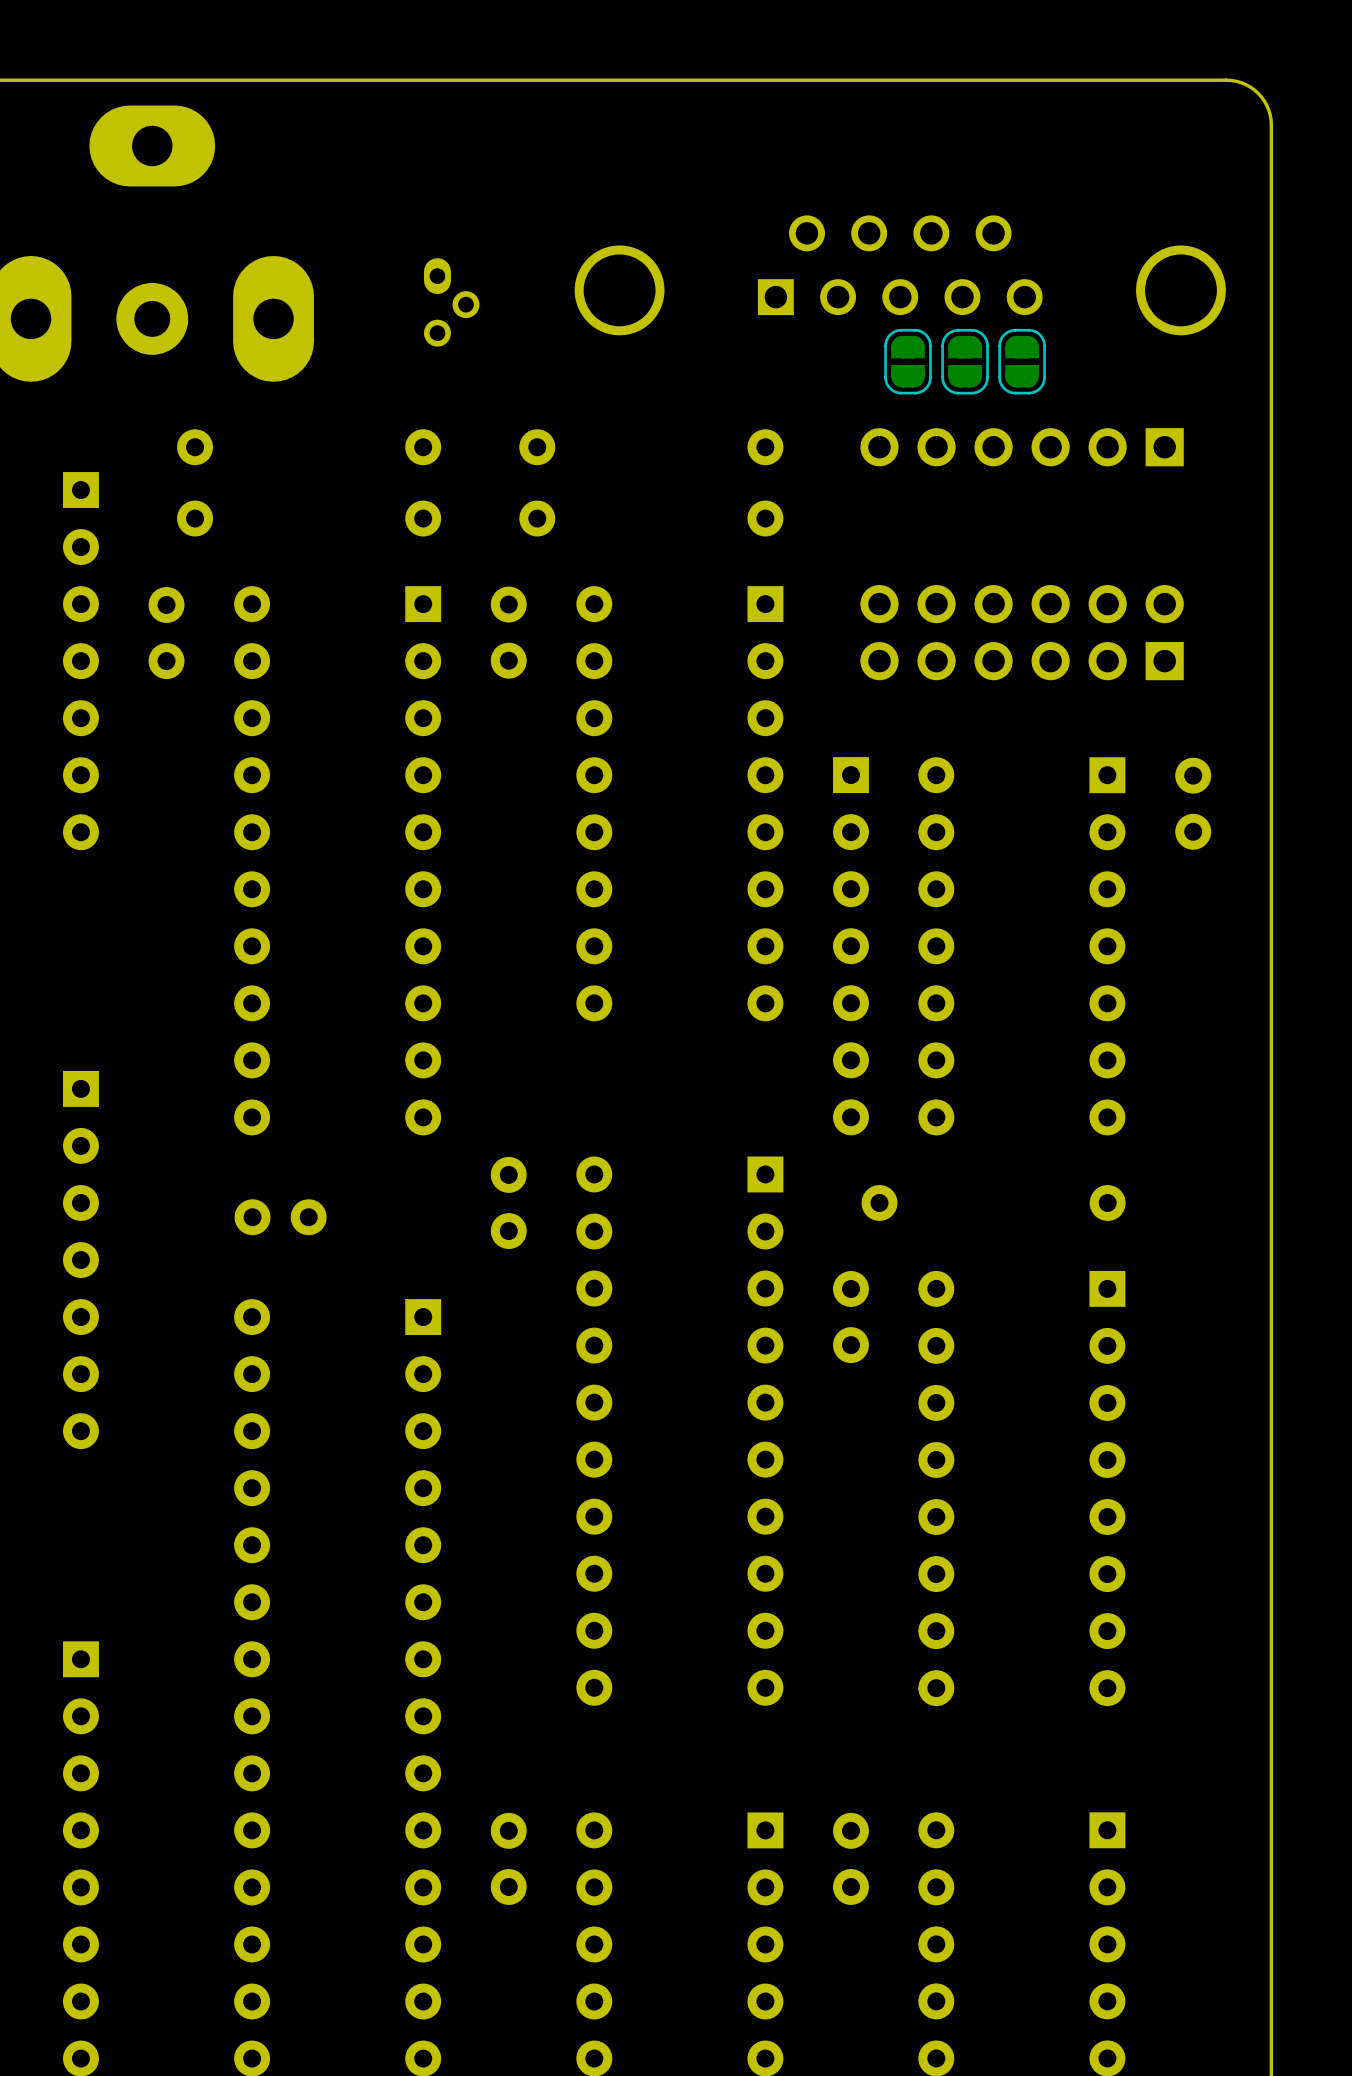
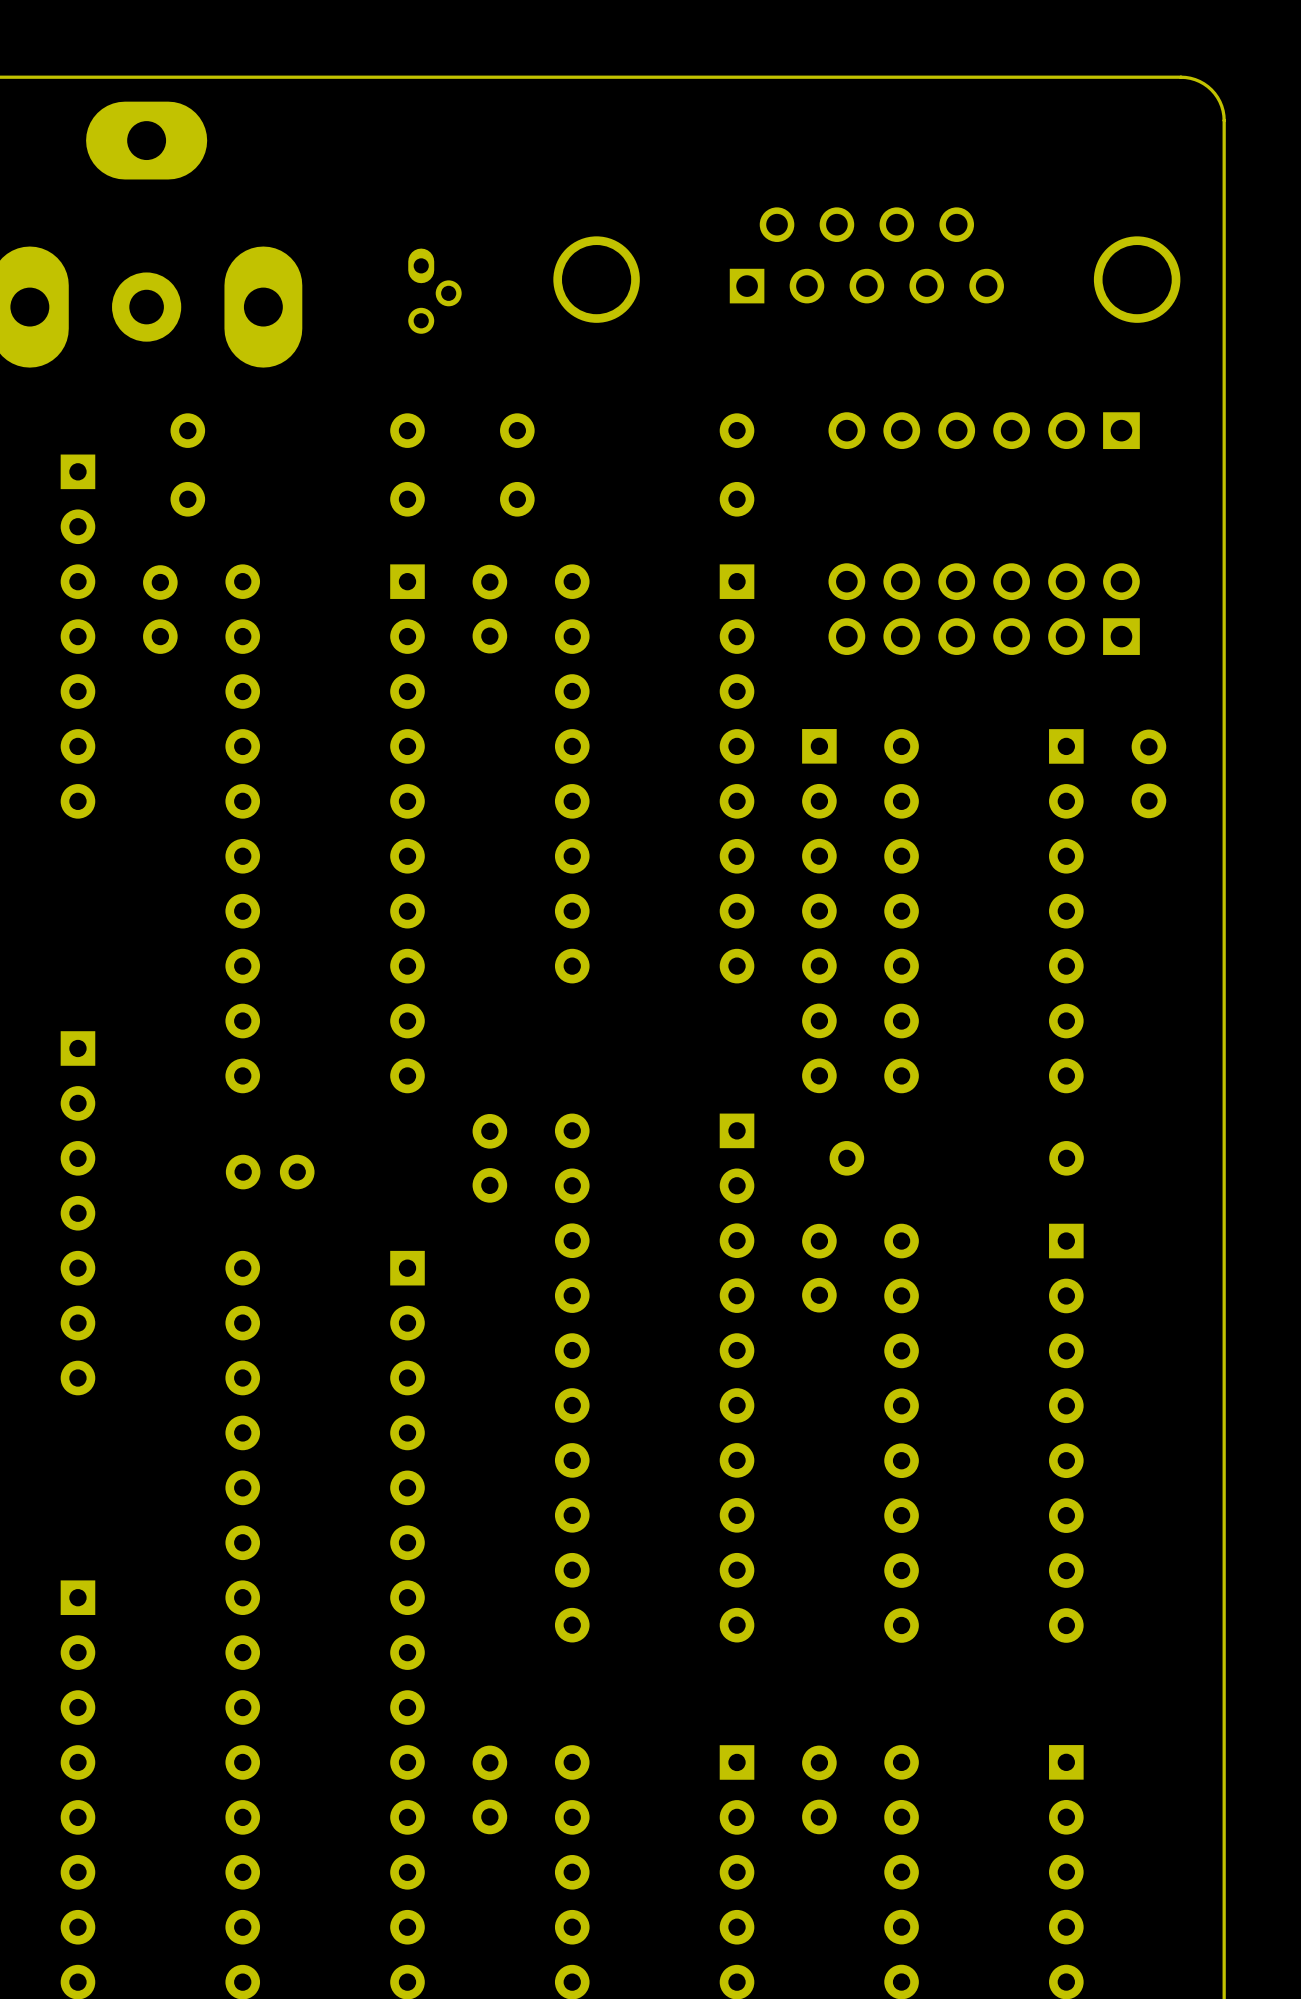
part: (908, 361) -> none
part: (965, 361) -> none
part: (1022, 361) -> none

